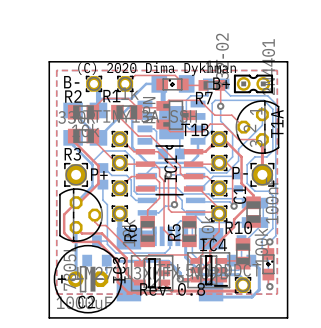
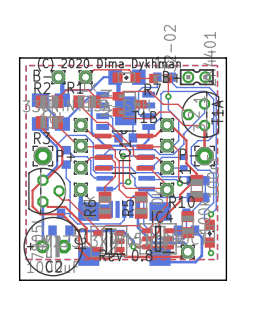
top track: (164, 213) (164, 229) (174, 240) (189, 240) -> (119, 189) (126, 197) (141, 197)

